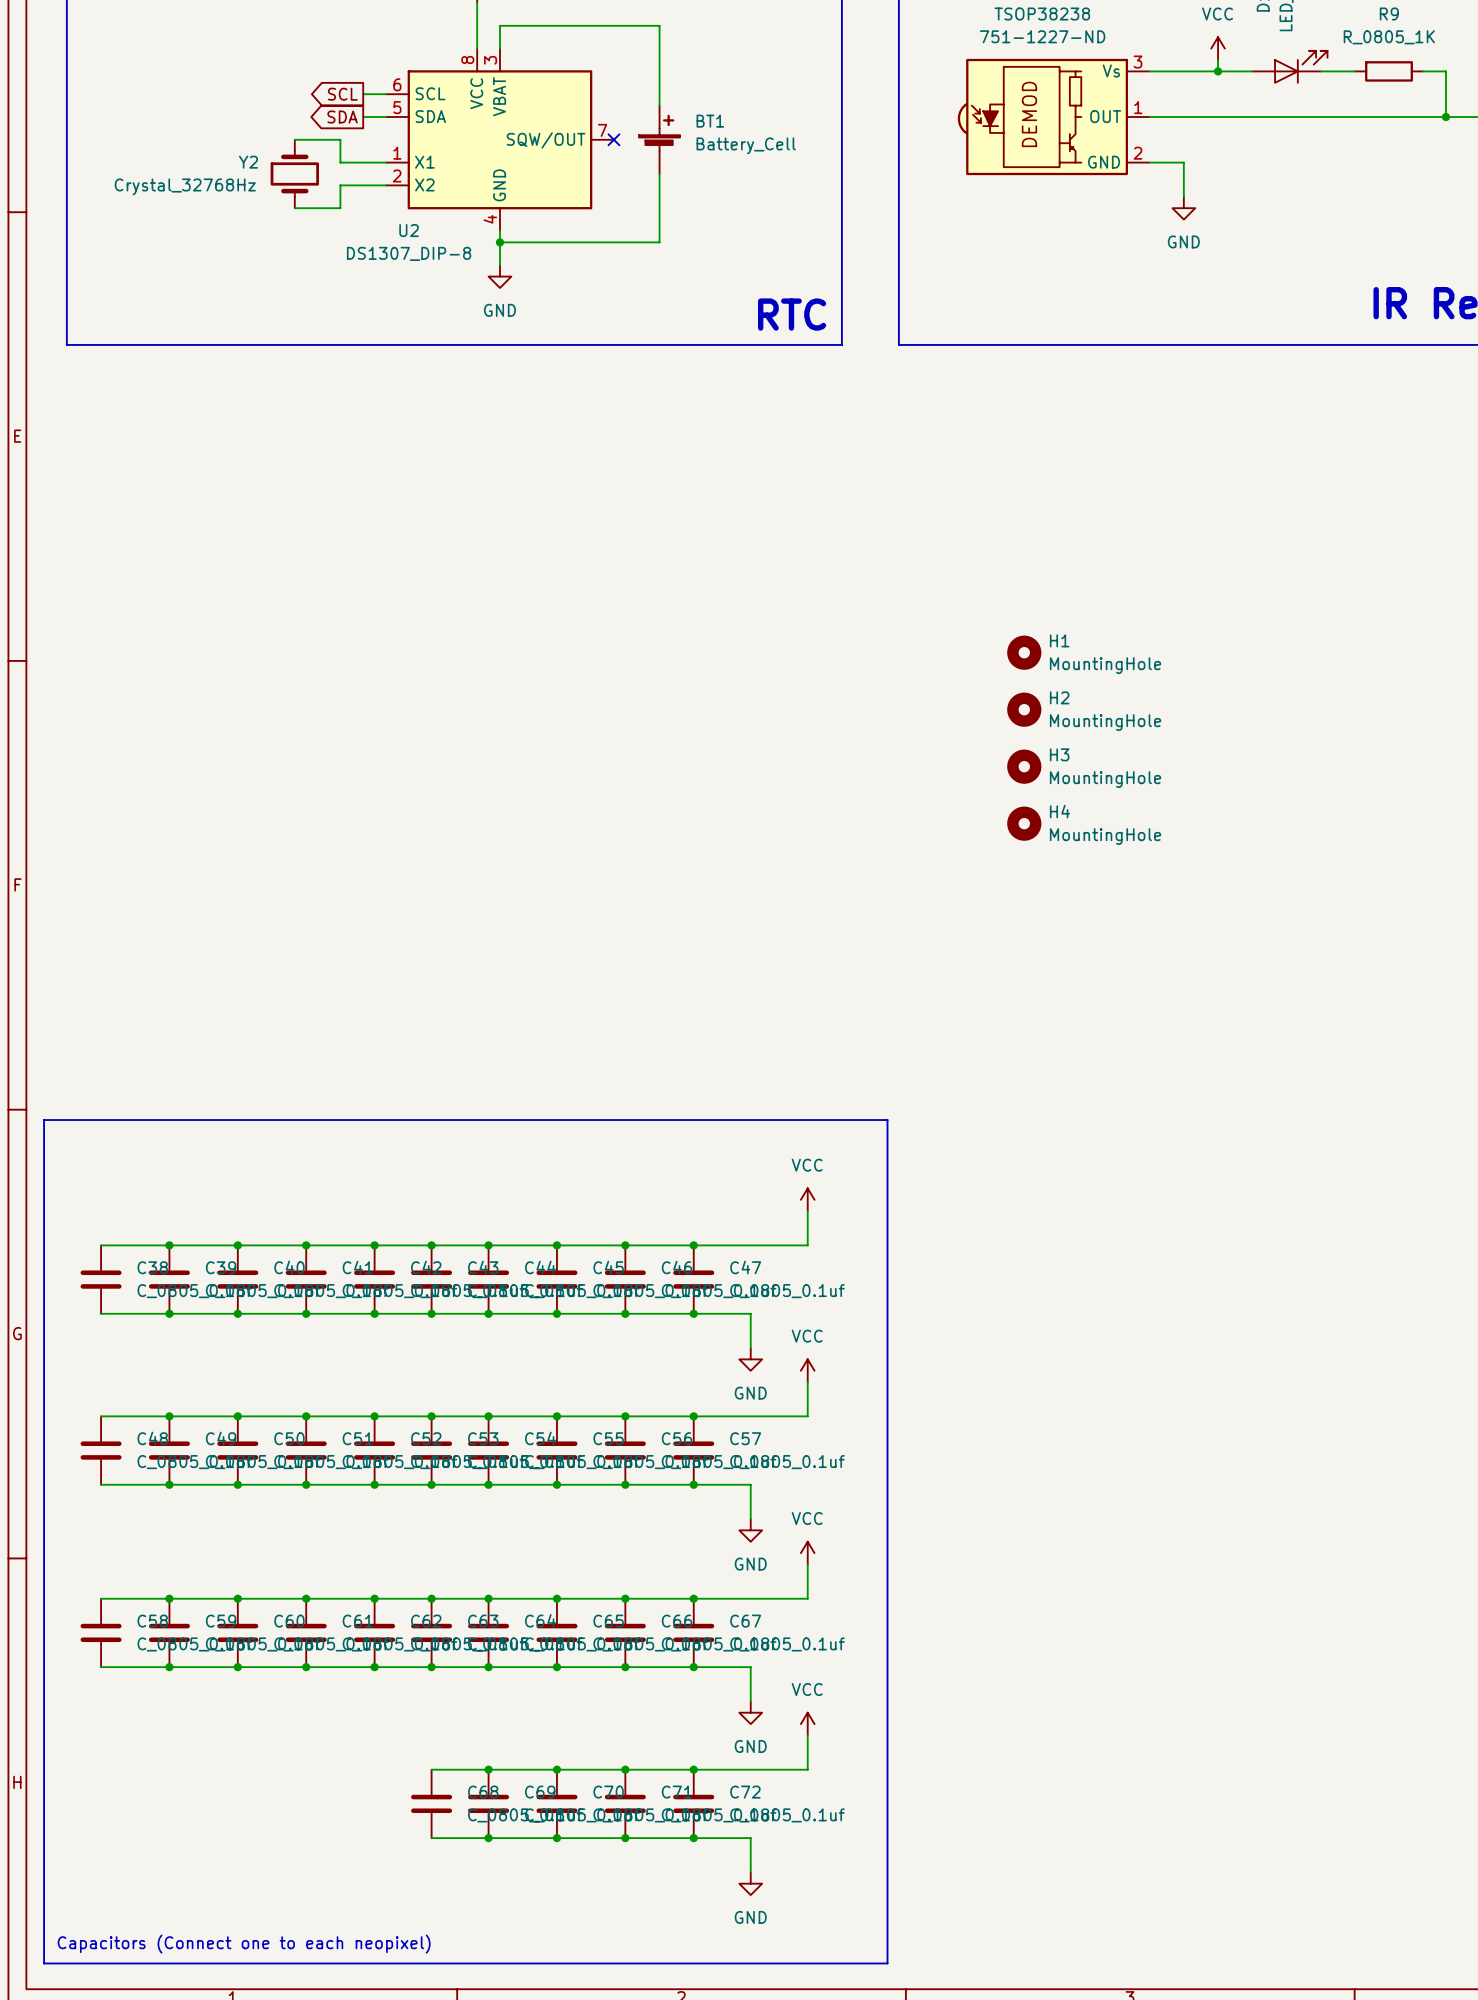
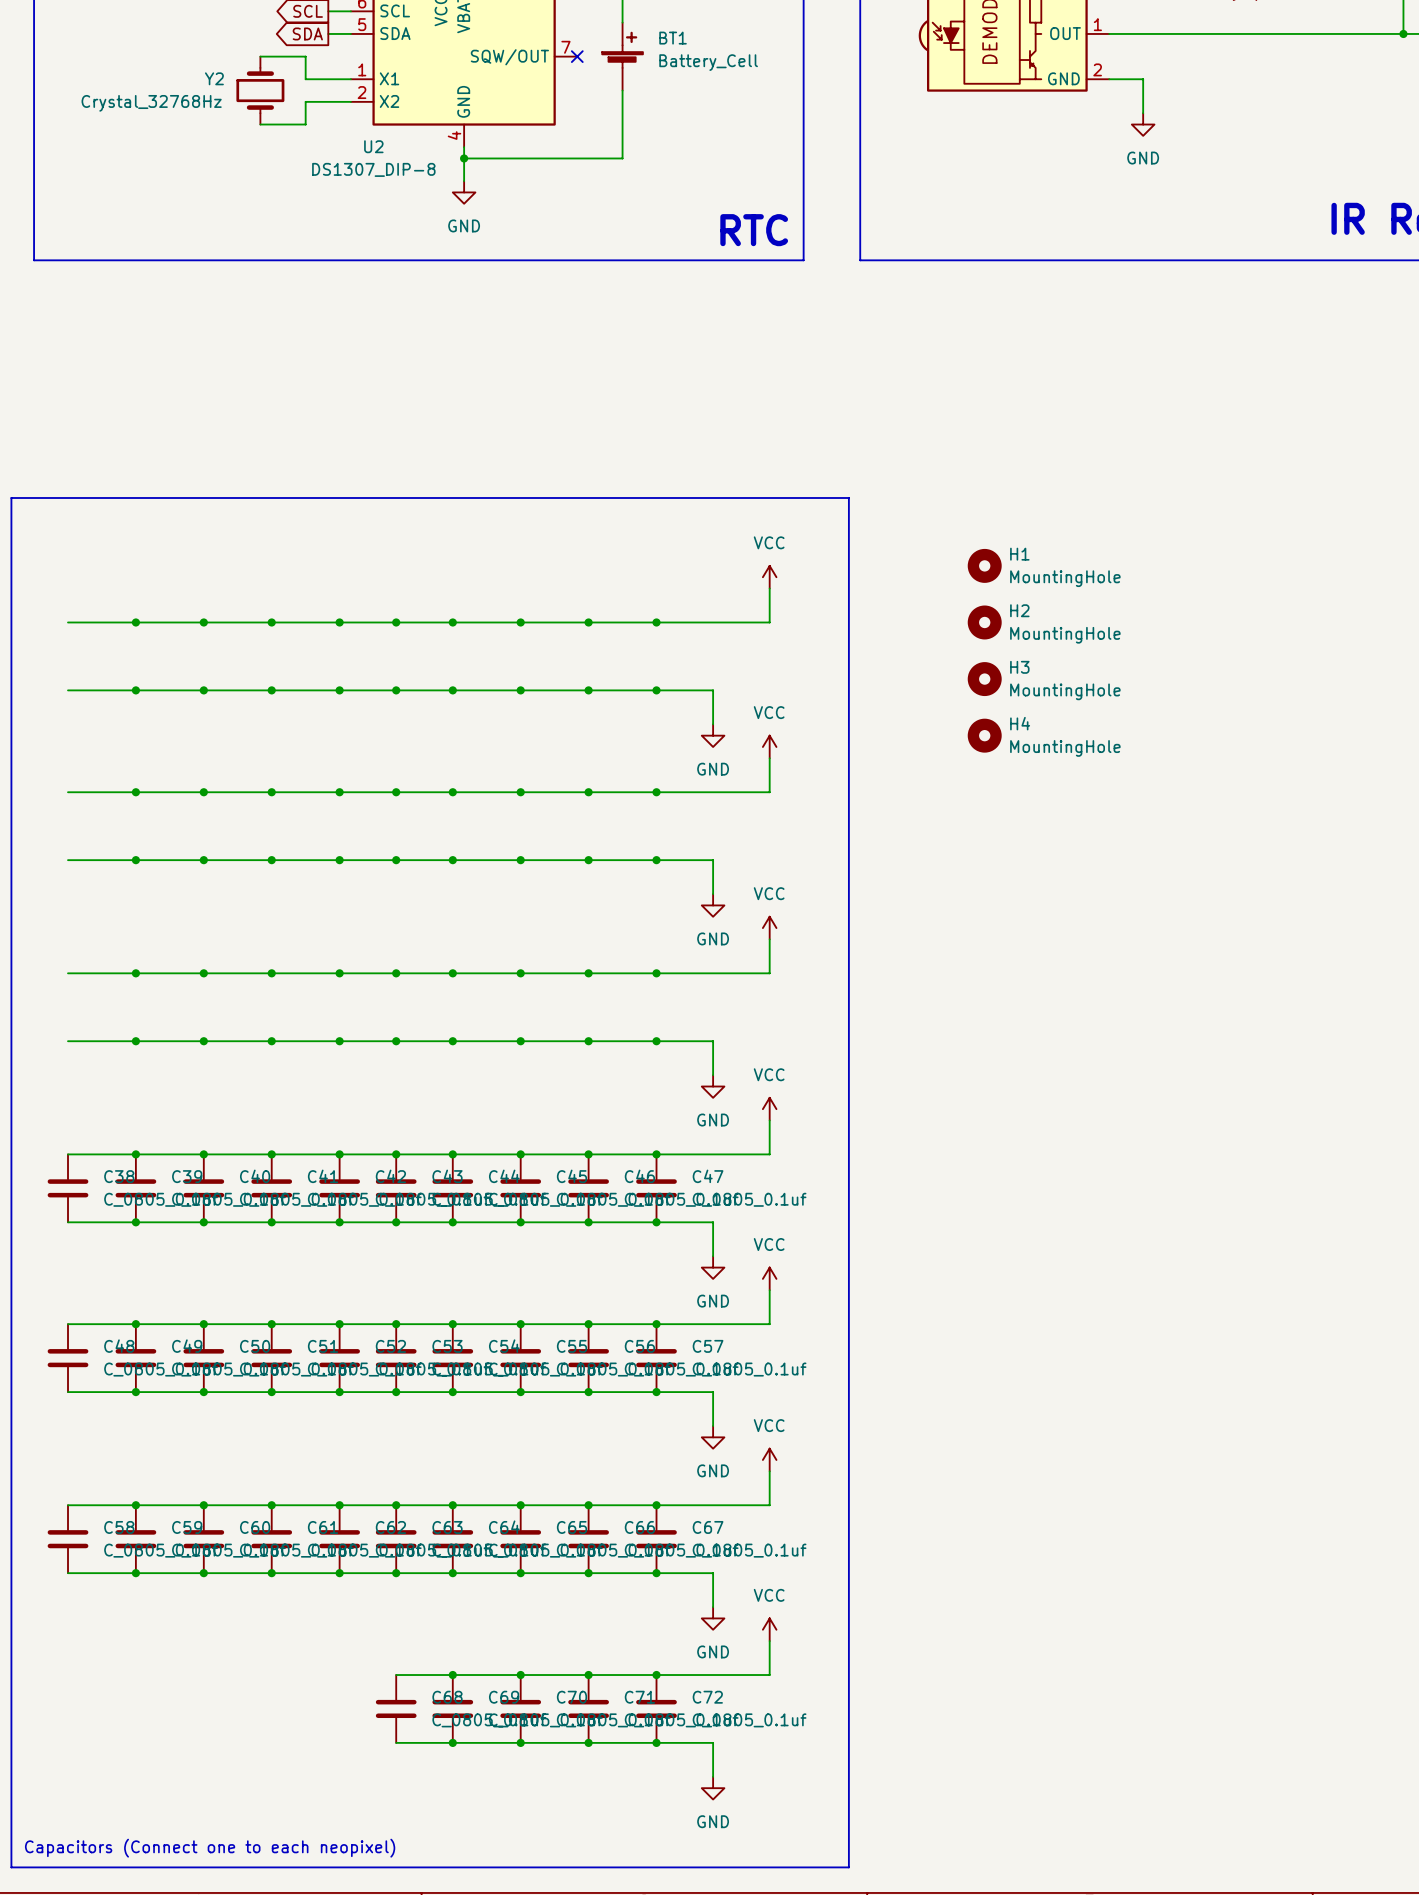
power symbol: none -> VCC (769, 577)
wire: none -> (769, 588) (769, 622) (68, 622)
junction: none -> (135, 622)
junction: none -> (203, 622)
junction: none -> (271, 622)
junction: none -> (339, 622)
junction: none -> (396, 622)
junction: none -> (452, 622)
junction: none -> (520, 622)
junction: none -> (588, 622)
junction: none -> (656, 622)
wire: none -> (68, 690) (713, 690) (713, 724)
junction: none -> (135, 690)
junction: none -> (203, 690)
junction: none -> (271, 690)
junction: none -> (339, 690)
junction: none -> (396, 690)
junction: none -> (452, 690)
junction: none -> (520, 690)
junction: none -> (588, 690)
junction: none -> (656, 690)
power symbol: none -> GND (713, 735)
power symbol: none -> VCC (769, 746)
wire: none -> (769, 758) (769, 792) (68, 792)
junction: none -> (135, 792)
junction: none -> (203, 792)
junction: none -> (271, 792)
junction: none -> (339, 792)
junction: none -> (396, 792)
junction: none -> (452, 792)
junction: none -> (520, 792)
junction: none -> (588, 792)
junction: none -> (656, 792)
wire: none -> (68, 860) (713, 860) (713, 894)
junction: none -> (135, 860)
junction: none -> (203, 860)
junction: none -> (271, 860)
junction: none -> (339, 860)
junction: none -> (396, 860)
junction: none -> (452, 860)
junction: none -> (520, 860)
junction: none -> (588, 860)
junction: none -> (656, 860)
power symbol: none -> GND (713, 905)
power symbol: none -> VCC (769, 928)
wire: none -> (769, 939) (769, 973) (68, 973)
junction: none -> (135, 973)
junction: none -> (203, 973)
junction: none -> (271, 973)
junction: none -> (339, 973)
junction: none -> (396, 973)
junction: none -> (452, 973)
junction: none -> (520, 973)
junction: none -> (588, 973)
junction: none -> (656, 973)
line: (44, 1120) (887, 1120) -> (11, 1029) (11, 497) (848, 497) (848, 1029)
wire: none -> (68, 1041) (713, 1041) (713, 1075)
junction: none -> (135, 1041)
junction: none -> (203, 1041)
junction: none -> (271, 1041)
junction: none -> (339, 1041)
junction: none -> (396, 1041)
junction: none -> (452, 1041)
junction: none -> (520, 1041)
junction: none -> (588, 1041)
junction: none -> (656, 1041)
power symbol: none -> GND (713, 1086)

